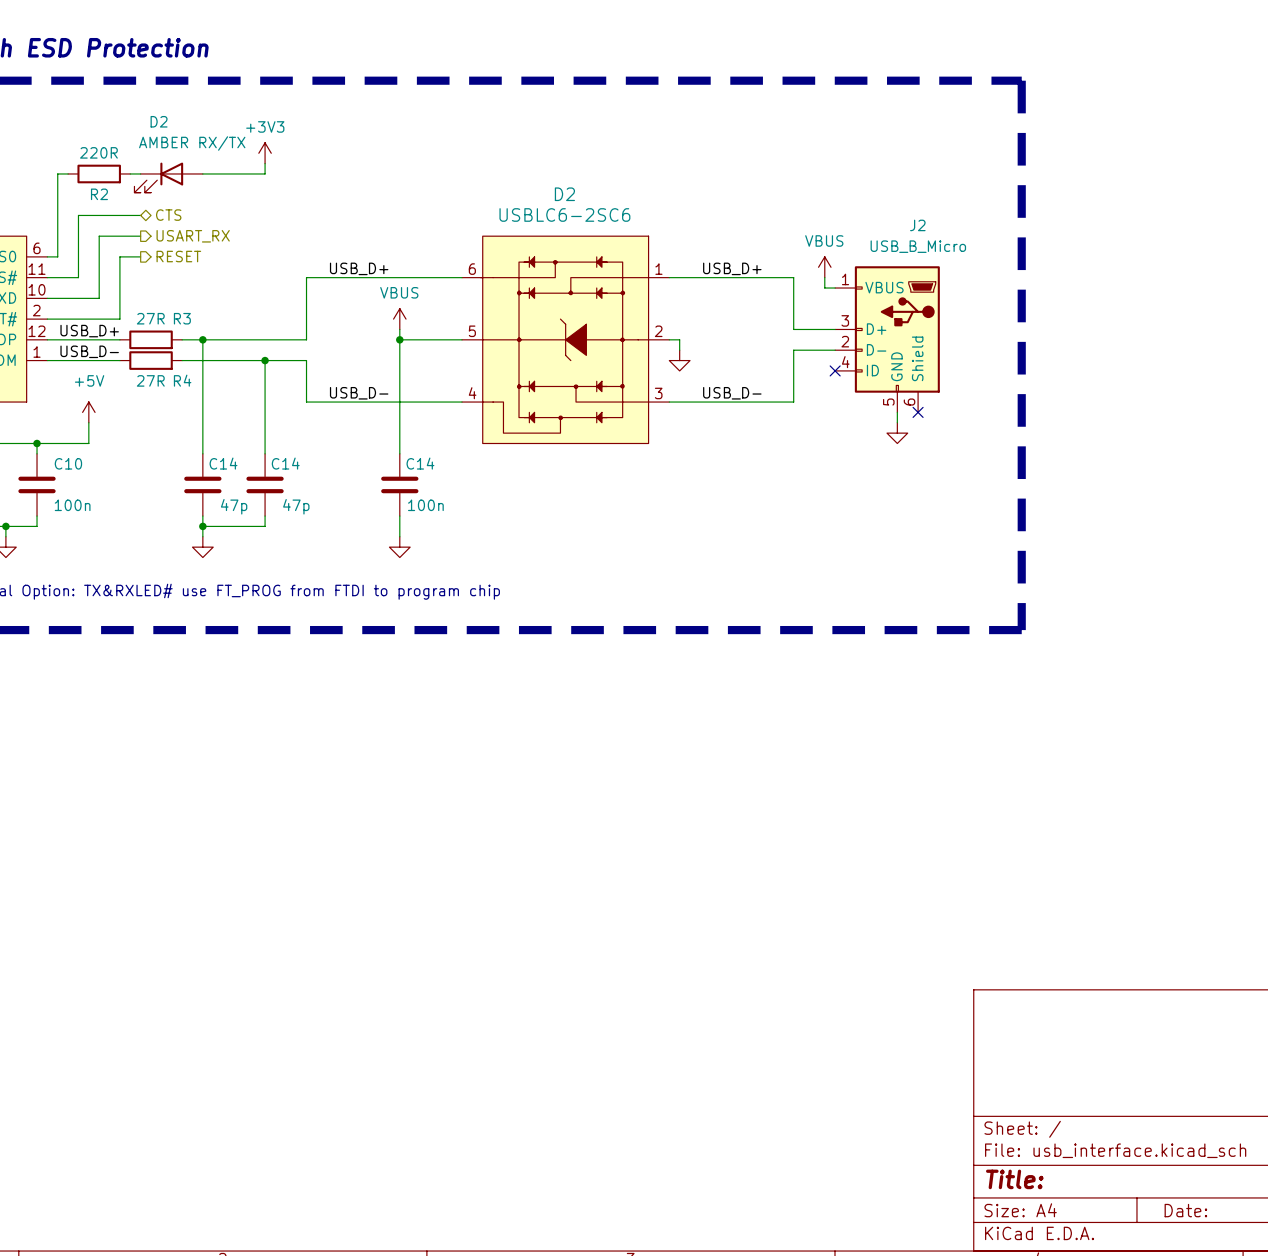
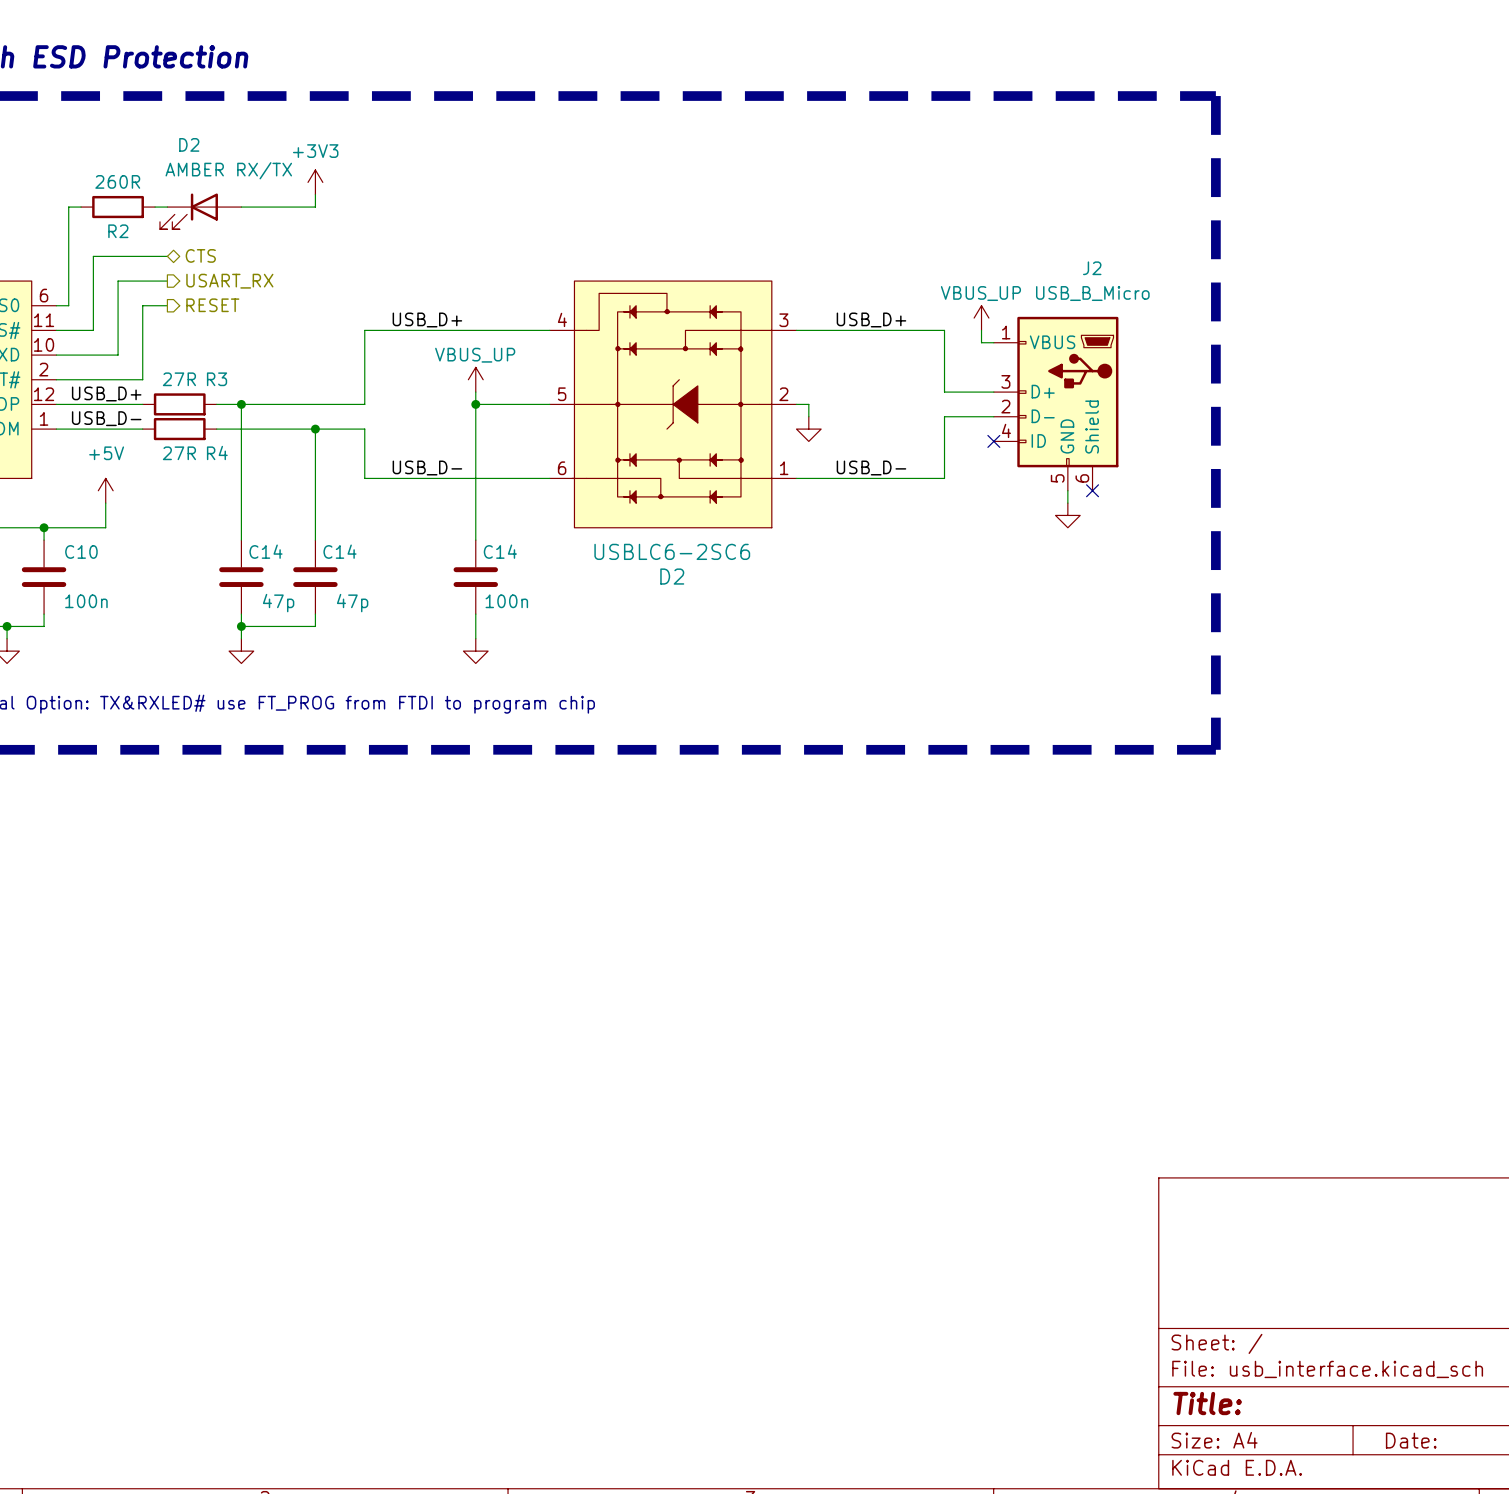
R2 value: 220R (98, 152) -> 260R (117, 181)
power symbol: VBUS (824, 267) -> VBUS_UP (981, 318)
power symbol: VBUS (399, 319) -> VBUS_UP (475, 379)
D2 flip: as is (564, 339) -> up-down (671, 404)

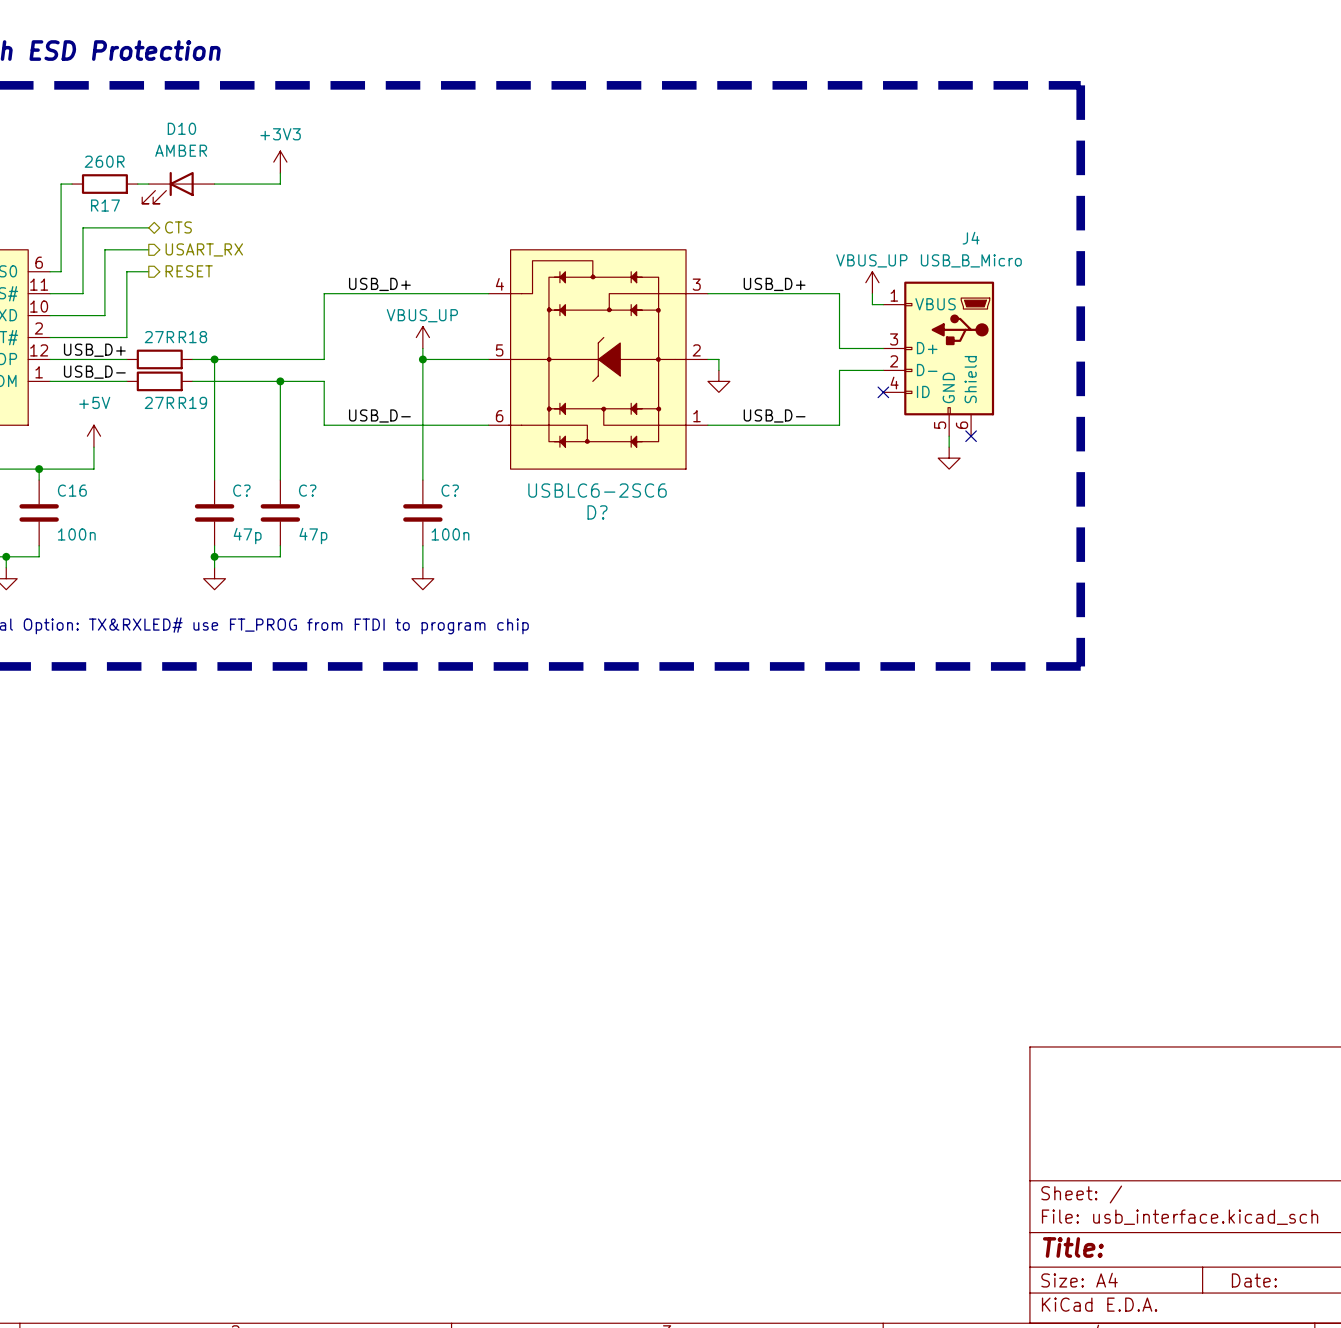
D2 name: D2 (189, 144) -> D10 (181, 128)
D2 value: AMBER RX/TX (228, 170) -> AMBER (181, 150)
R2 name: R2 (118, 231) -> R17 (105, 205)
J2 name: J2 (1092, 268) -> J4 (971, 238)
R3 name: R3 (217, 379) -> R18 (192, 337)
R4 name: R4 (217, 453) -> R19 (192, 402)
C10 name: C10 (81, 551) -> C16 (72, 490)
C14 name: C14 (265, 551) -> C? (241, 490)
C14 name: C14 (339, 551) -> C? (307, 490)
C14 name: C14 (500, 551) -> C? (450, 490)
D2 name: D2 (672, 576) -> D? (597, 512)

